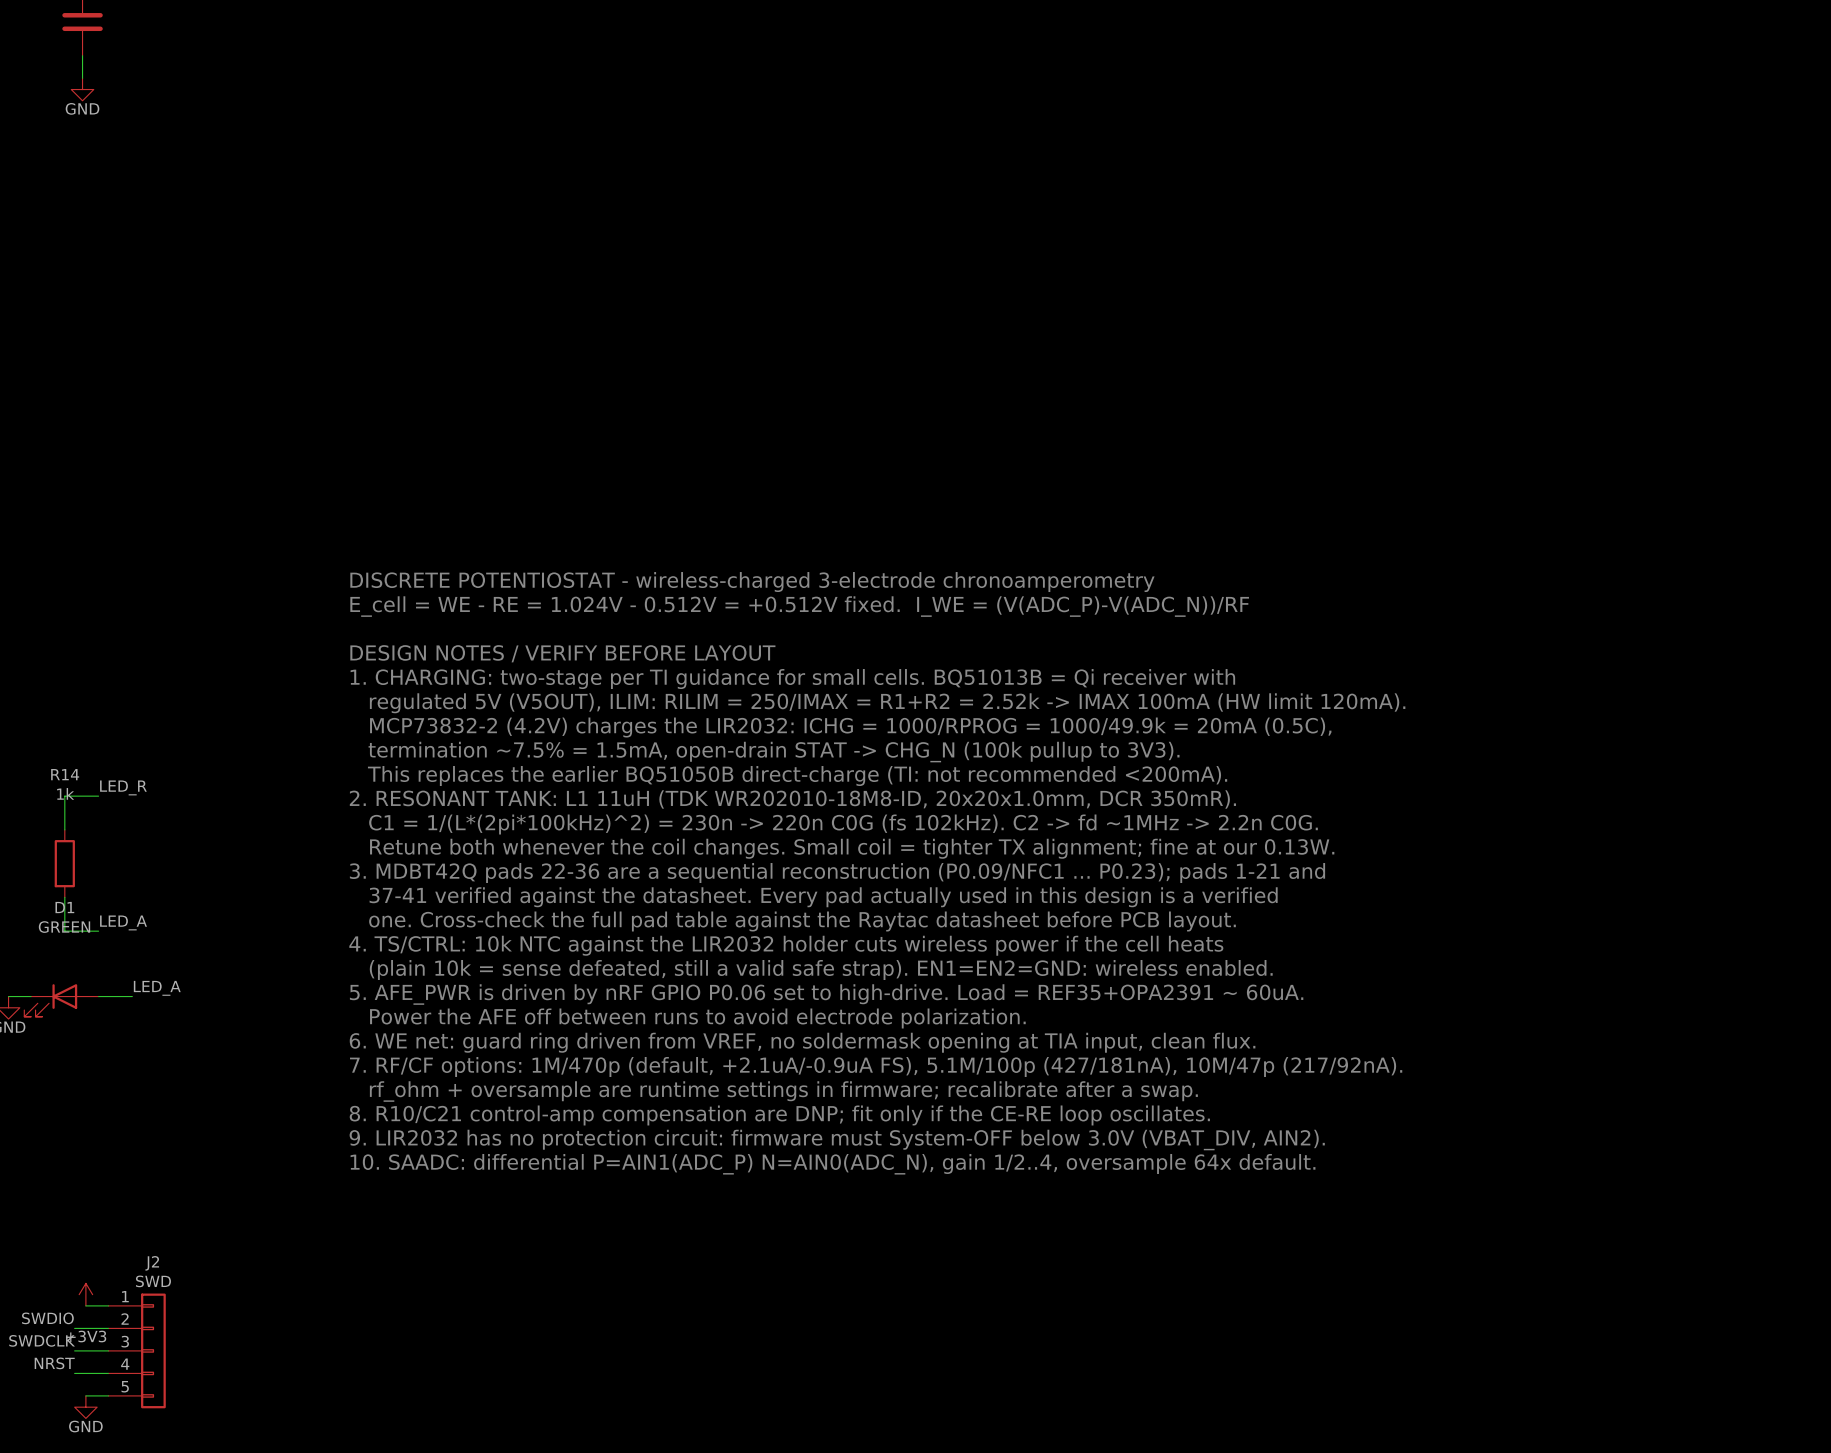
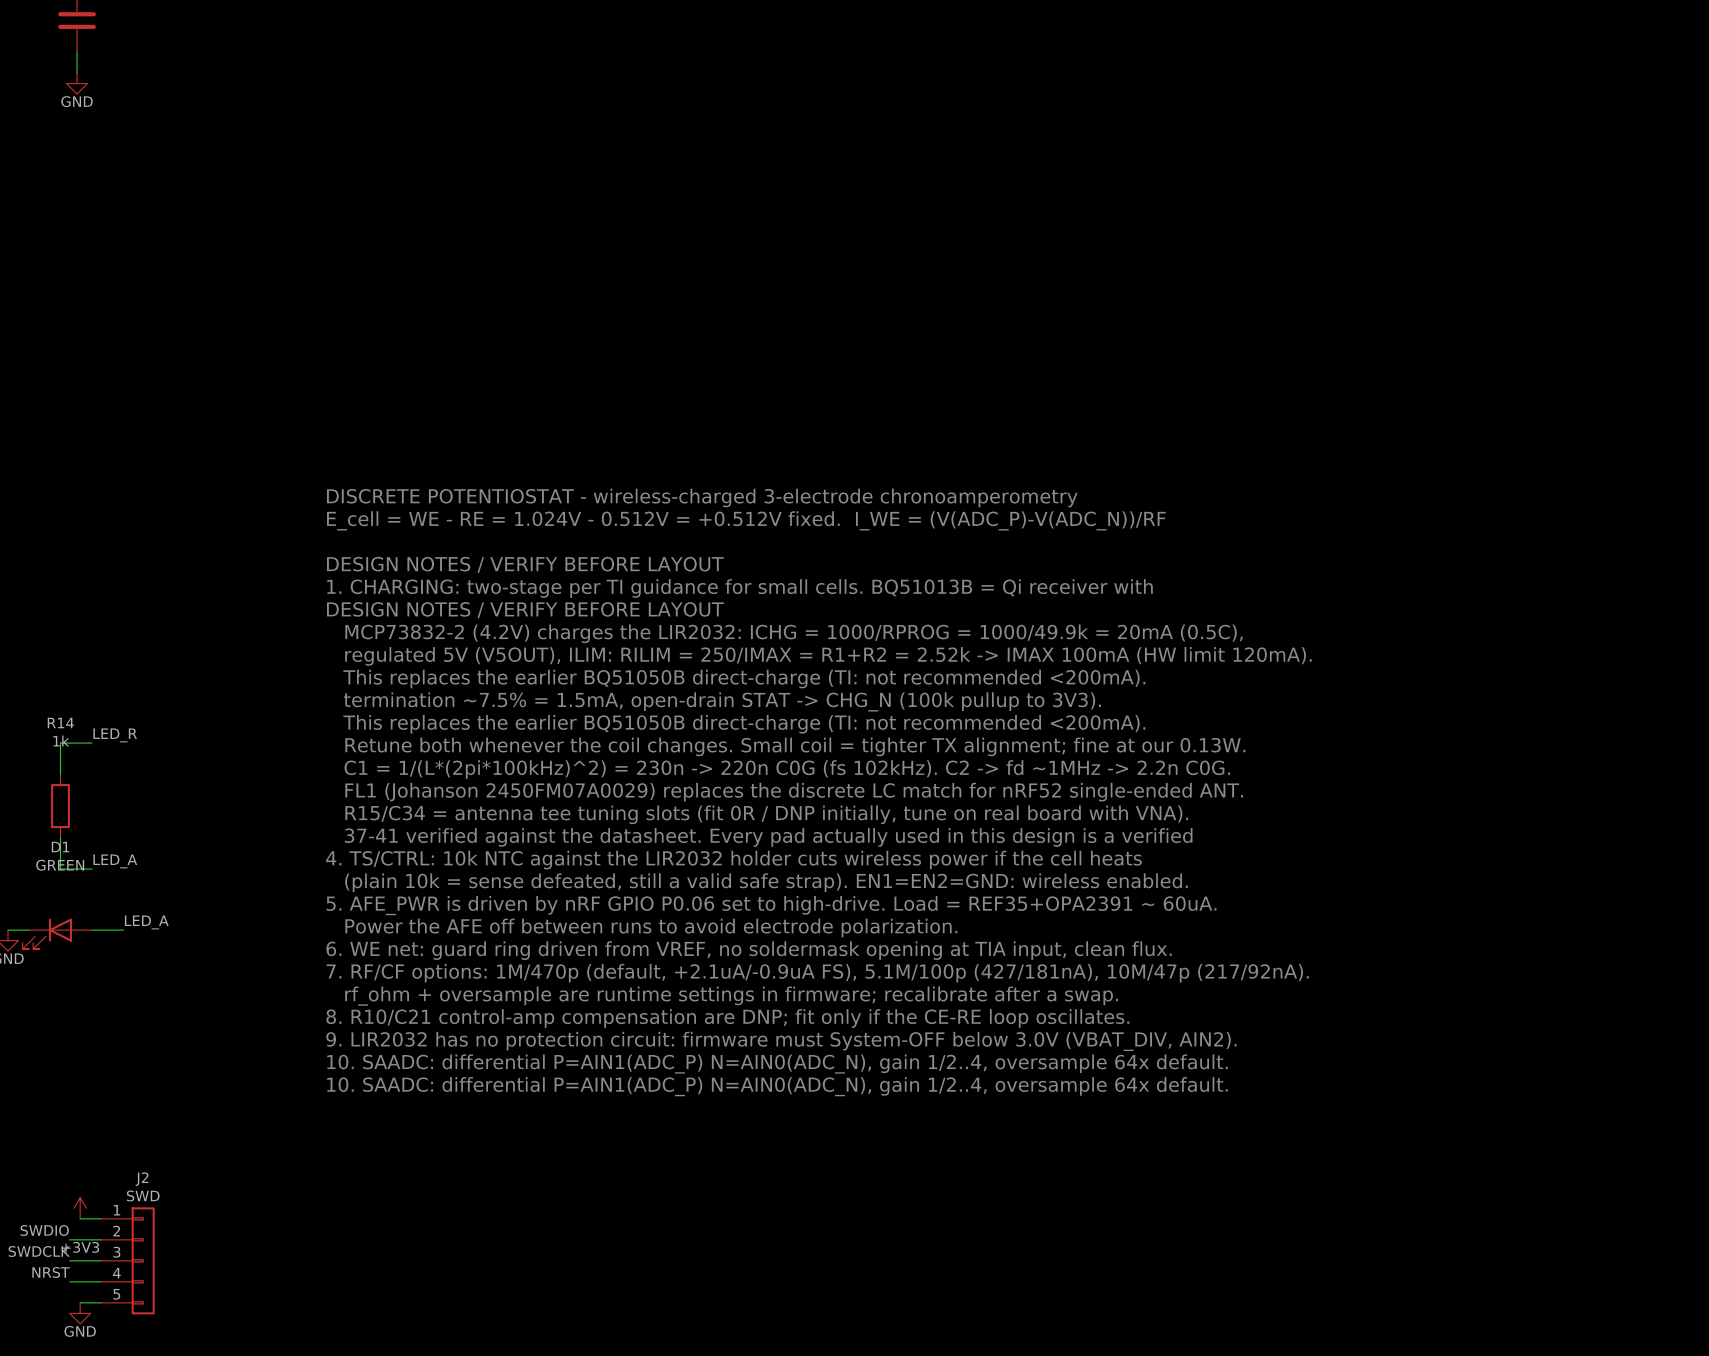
text: none -> E_cell = WE - RE = 1.024V - 0.512V = +0.512V fixed. I_WE = (V(ADC_P)-V(ADC_N))/RF (746, 520)
text position: DISCRETE POTENTIOSTAT - wireless-charged 3-electrode chronoamperometry (752, 582) -> DISCRETE POTENTIOSTAT - wireless-charged 3-electrode chronoamperometry (702, 497)
text: E_cell = WE - RE = 1.024V - 0.512V = +0.512V fixed. I_WE = (V(ADC_P)-V(ADC_N))/RF (799, 606) -> DESIGN NOTES / VERIFY BEFORE LAYOUT (525, 564)
text: none -> 1. CHARGING: two-stage per TI guidance for small cells. BQ51013B = Qi receiver with (740, 588)
text: 1. CHARGING: two-stage per TI guidance for small cells. BQ51013B = Qi receiver with (792, 679) -> MCP73832-2 (4.2V) charges the LIR2032: ICHG = 1000/RPROG = 1000/49.9k = 20mA (0.5C), (794, 633)
text: MCP73832-2 (4.2V) charges the LIR2032: ICHG = 1000/RPROG = 1000/49.9k = 20mA (0.5C), (850, 727) -> This replaces the earlier BQ51050B direct-charge (TI: not recommended <200mA). (744, 679)
text: 2. RESONANT TANK: L1 11uH (TDK WR202010-18M8-ID, 20x20x1.0mm, DCR 350mR). (792, 799) -> Retune both whenever the coil changes. Small coil = tighter TX alignment; fine at our 0.13W. (795, 746)
text: Retune both whenever the coil changes. Small coil = tighter TX alignment; fine at our 0.13W. (852, 848) -> FL1 (Johanson 2450FM07A0029) replaces the discrete LC match for nRF52 single-ended ANT. (794, 792)
text: 3. MDBT42Q pads 22-36 are a sequential reconstruction (P0.09/NFC1 ... P0.23); pads 1-21 and (837, 873) -> R15/C34 = antenna tee tuning slots (fit 0R / DNP initially, tune on real board with VNA). (766, 814)
text: one. Cross-check the full pad table against the Raytac datasheet before PCB layout. (802, 921) -> 4. TS/CTRL: 10k NTC against the LIR2032 holder cuts wireless power if the cell heats (733, 860)
text: 4. TS/CTRL: 10k NTC against the LIR2032 holder cuts wireless power if the cell heats (786, 945) -> (plain 10k = sense defeated, still a valid safe strap). EN1=EN2=GND: wireless enabled. (766, 882)
text: (plain 10k = sense defeated, still a valid safe strap). EN1=EN2=GND: wireless enabled. (821, 969) -> 5. AFE_PWR is driven by nRF GPIO P0.06 set to high-drive. Load = REF35+OPA2391 ~ 60uA. (771, 905)
text: 5. AFE_PWR is driven by nRF GPIO P0.06 set to high-drive. Load = REF35+OPA2391 ~ 60uA. (826, 994) -> Power the AFE off between runs to avoid electrode polarization. (651, 927)
text: Power the AFE off between runs to avoid electrode polarization. (697, 1018) -> 6. WE net: guard ring driven from VREF, no soldermask opening at TIA input, clean flux. (749, 950)
text: 6. WE net: guard ring driven from VREF, no soldermask opening at TIA input, clean flux. (802, 1042) -> 7. RF/CF options: 1M/470p (default, +2.1uA/-0.9uA FS), 5.1M/100p (427/181nA), 10M/47p (217/92nA). (817, 973)
text: 7. RF/CF options: 1M/470p (default, +2.1uA/-0.9uA FS), 5.1M/100p (427/181nA), 10M/47p (217/92nA). (876, 1066) -> rf_ohm + oversample are runtime settings in firmware; recalibrate after a swap. (731, 996)
text: rf_ohm + oversample are runtime settings in firmware; recalibrate after a swap. (783, 1091) -> 8. R10/C21 control-amp compensation are DNP; fit only if the CE-RE loop oscillates. (727, 1018)
text: 8. R10/C21 control-amp compensation are DNP; fit only if the CE-RE loop oscillates. (779, 1115) -> 9. LIR2032 has no protection circuit: firmware must System-OFF below 3.0V (VBAT_DIV, AIN2). (781, 1041)
text: 9. LIR2032 has no protection circuit: firmware must System-OFF below 3.0V (VBAT_DIV, AIN2). (837, 1140) -> 10. SAADC: differential P=AIN1(ADC_P) N=AIN0(ADC_N), gain 1/2..4, oversample 64x default. (777, 1064)

